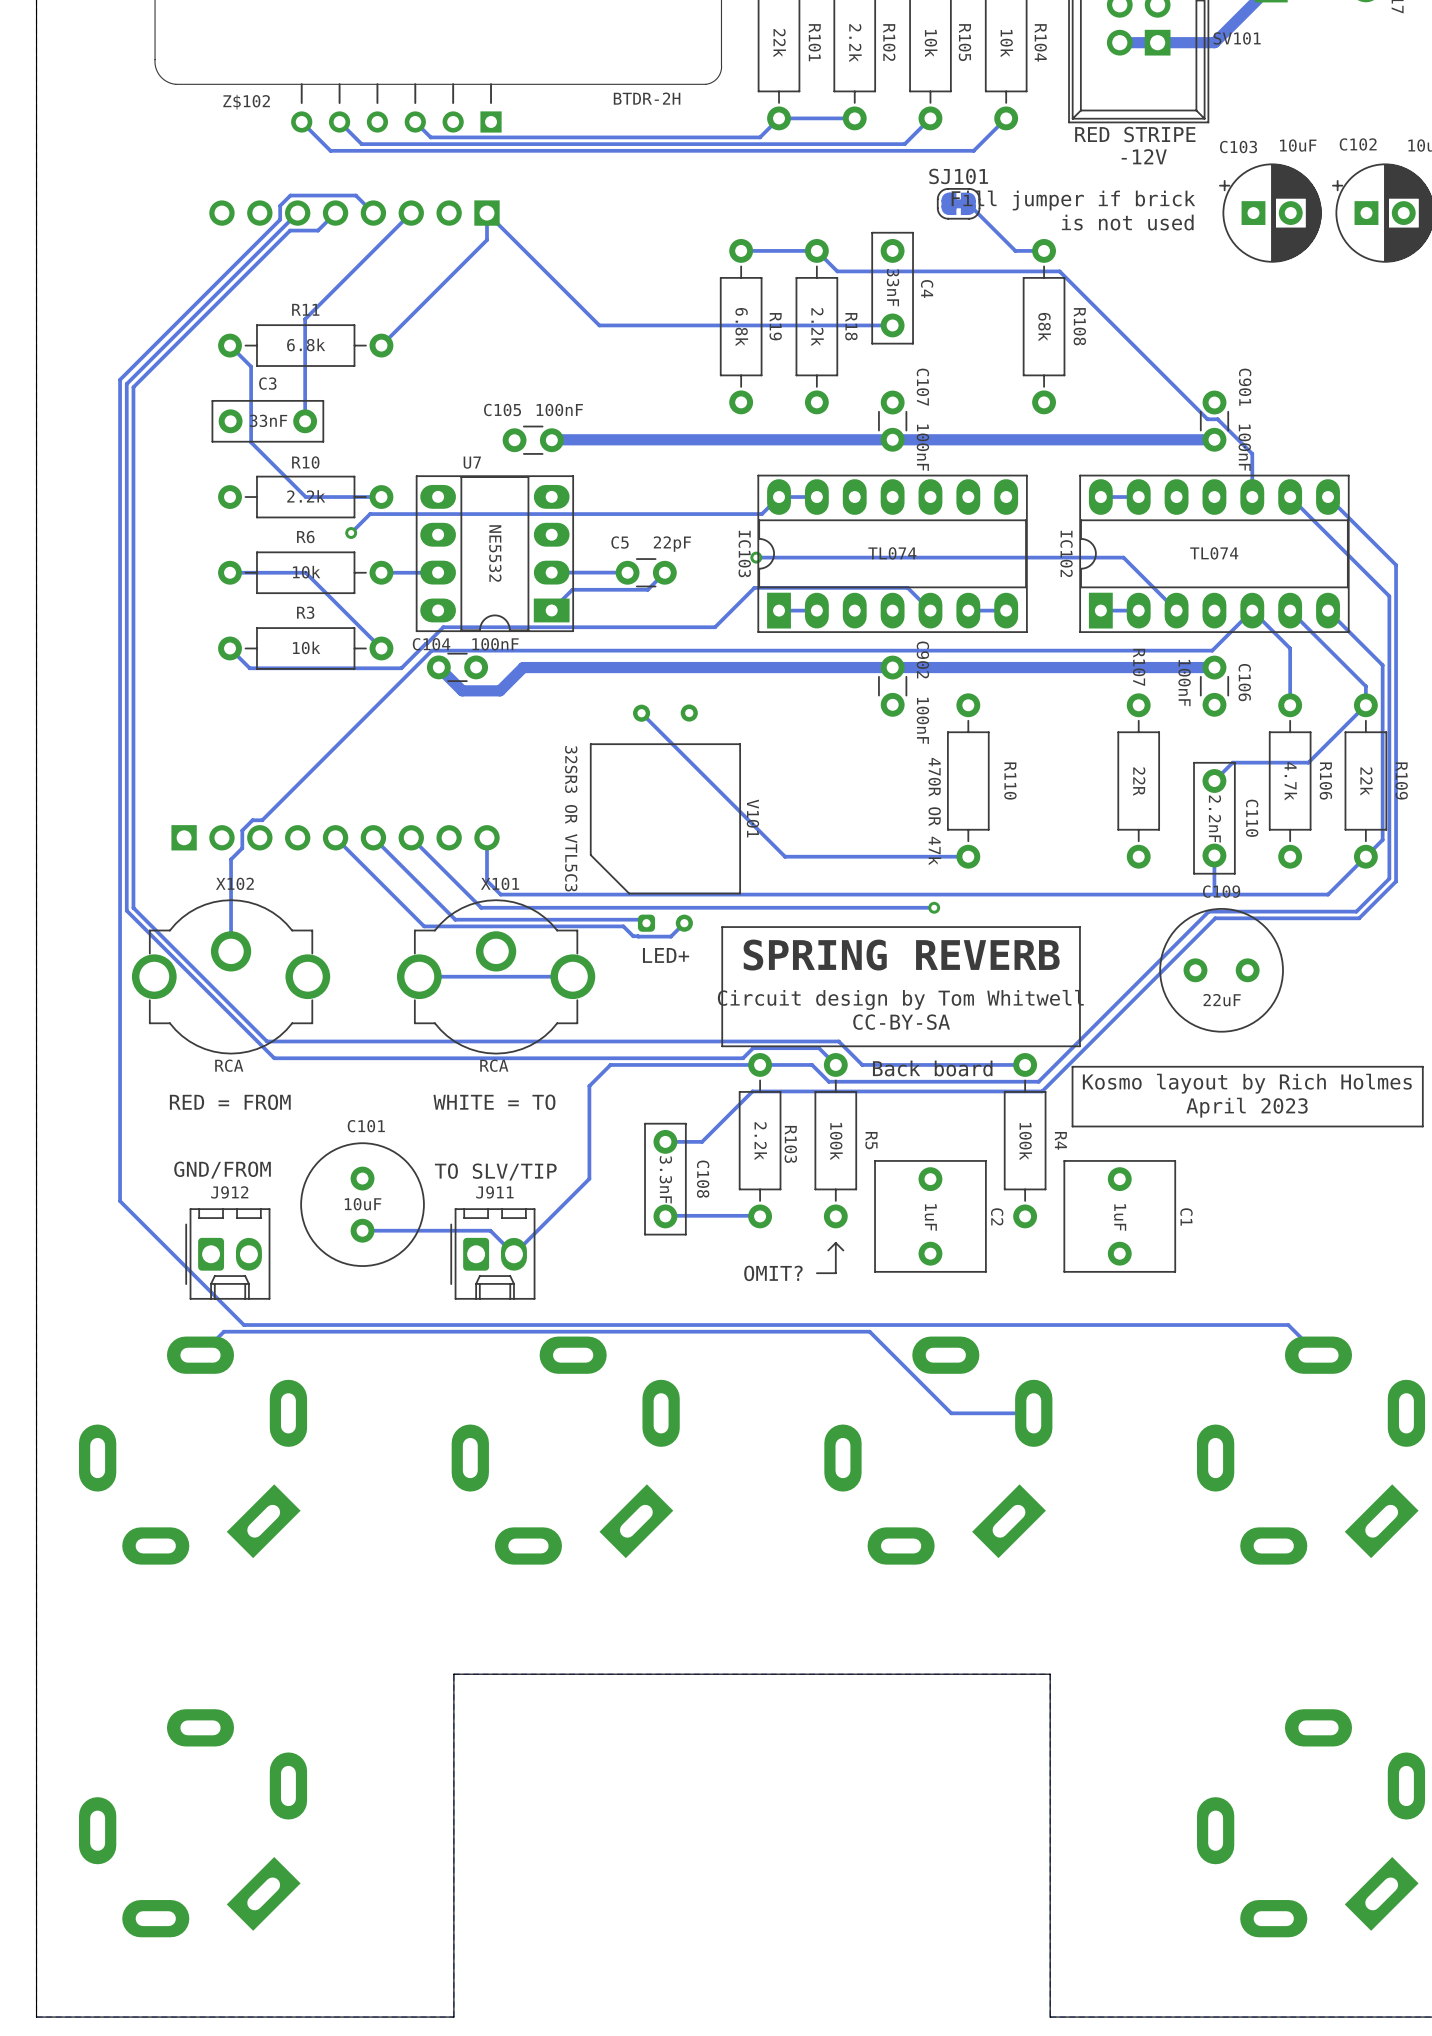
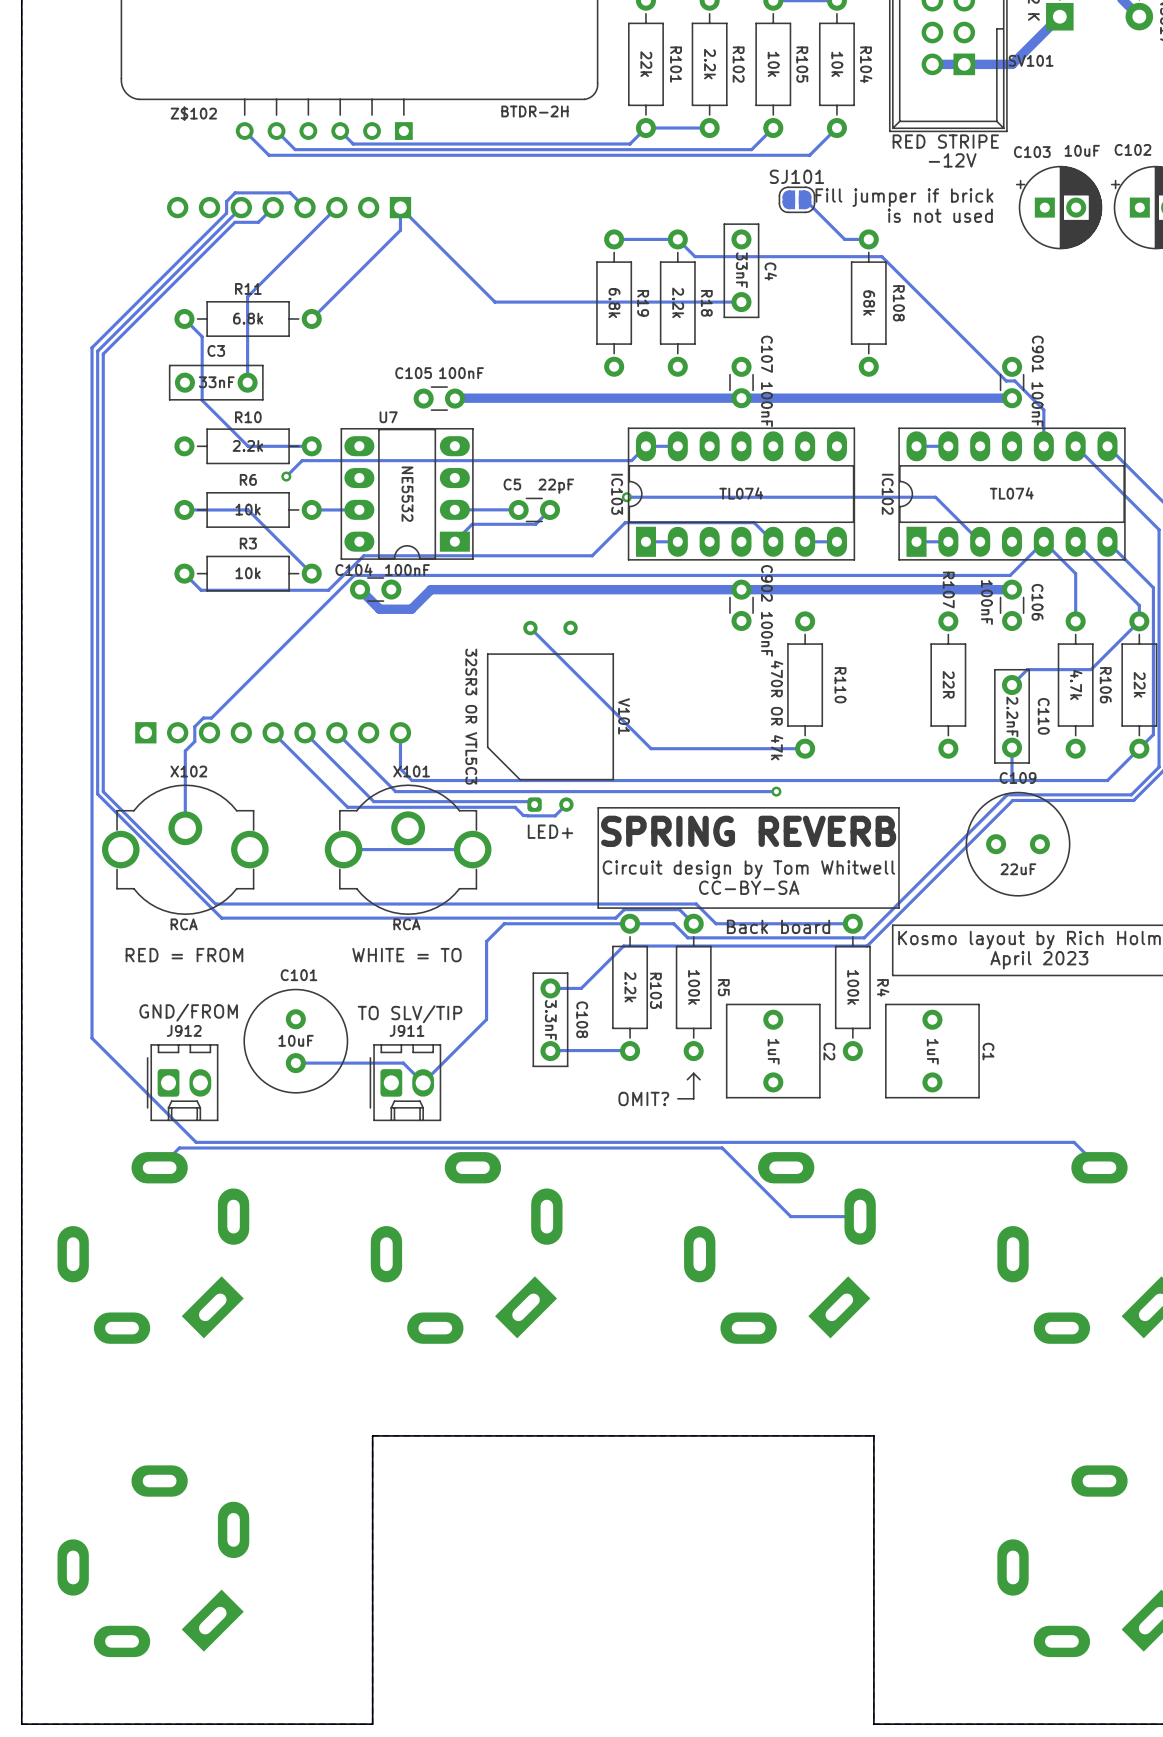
SJ101 footprint: [936, 188, 981, 220] -> [778, 186, 816, 214]

